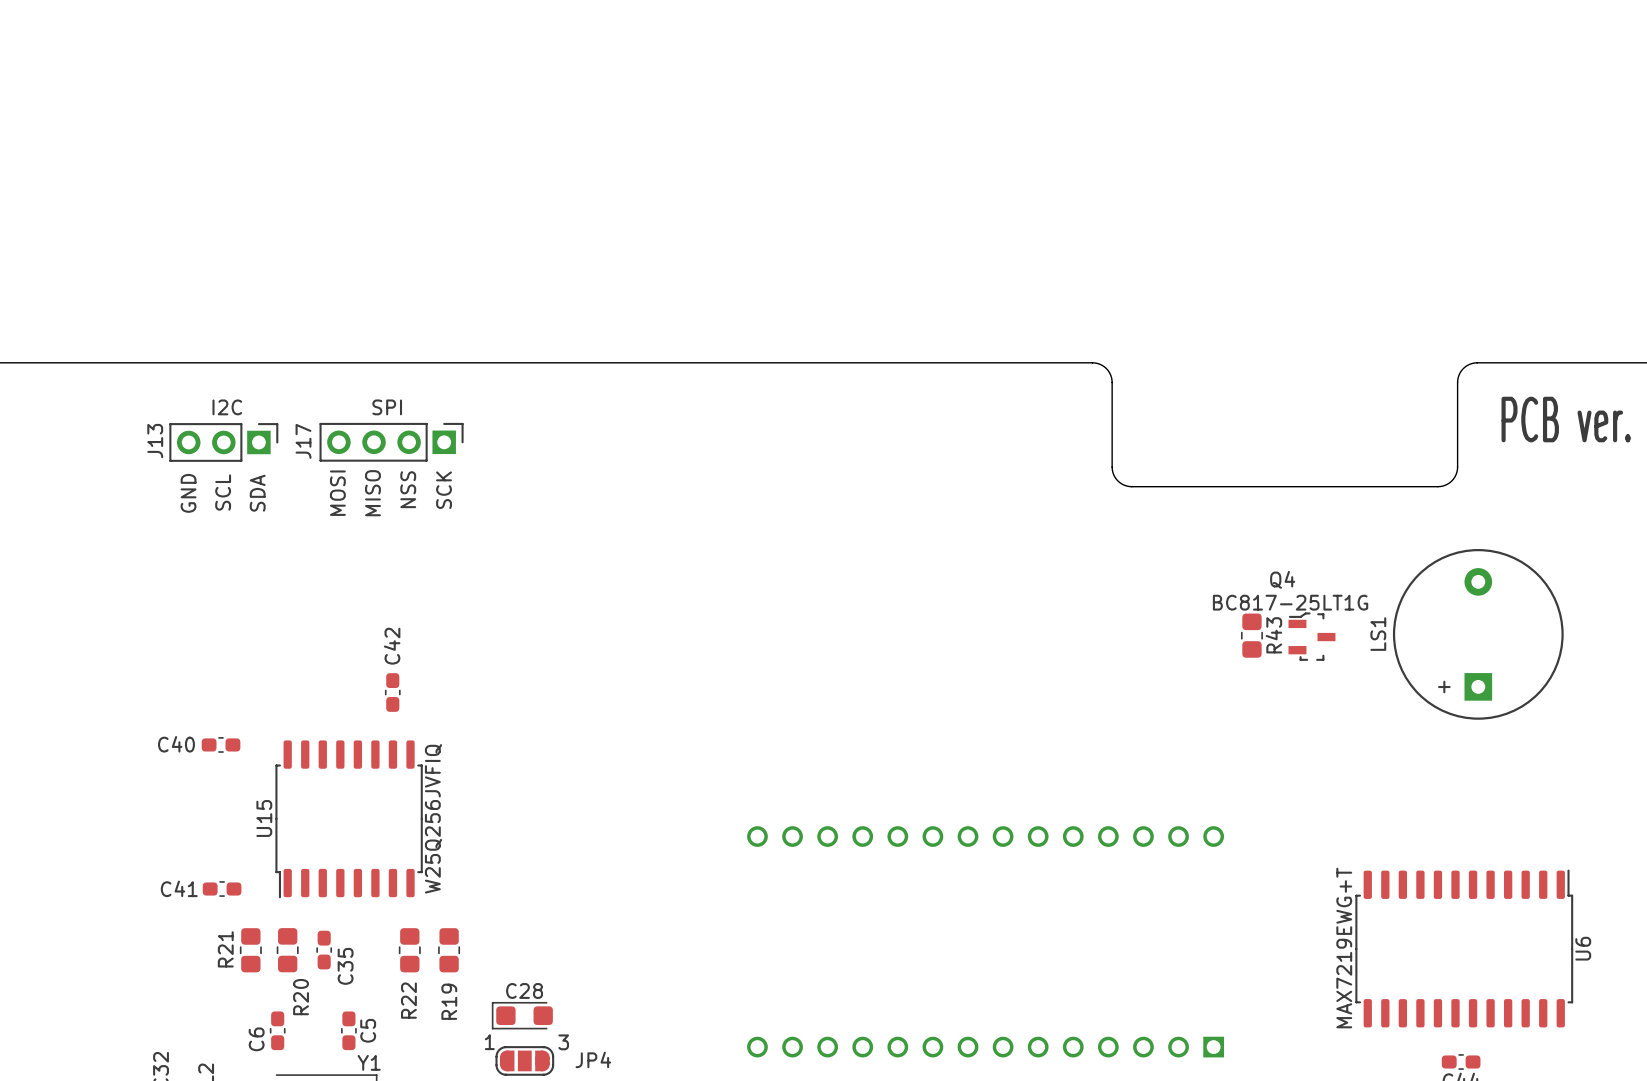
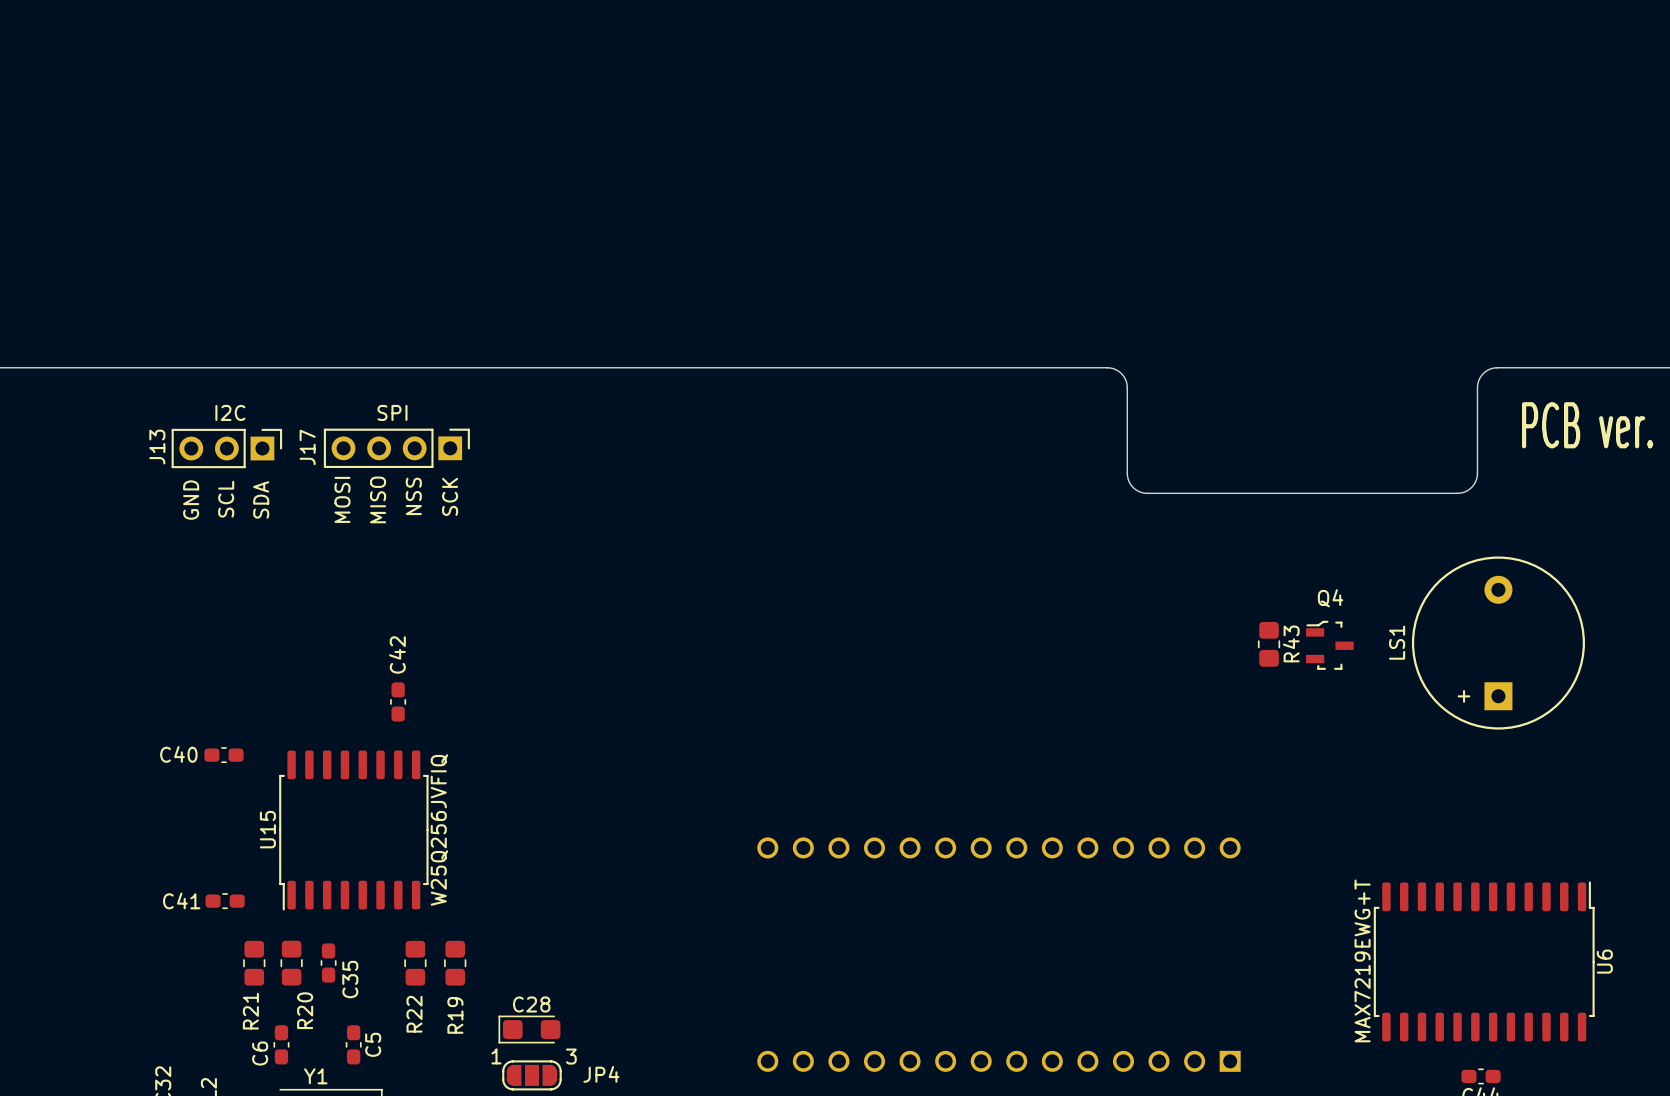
Q4 name position: Q4 (1282, 579) -> Q4 (1330, 598)
Q4 value: BC817-25LT1G (1290, 602) -> none
R21 name position: R21 (225, 949) -> R21 (250, 1011)
Y1 name position: Y1 (369, 1062) -> Y1 (315, 1076)

